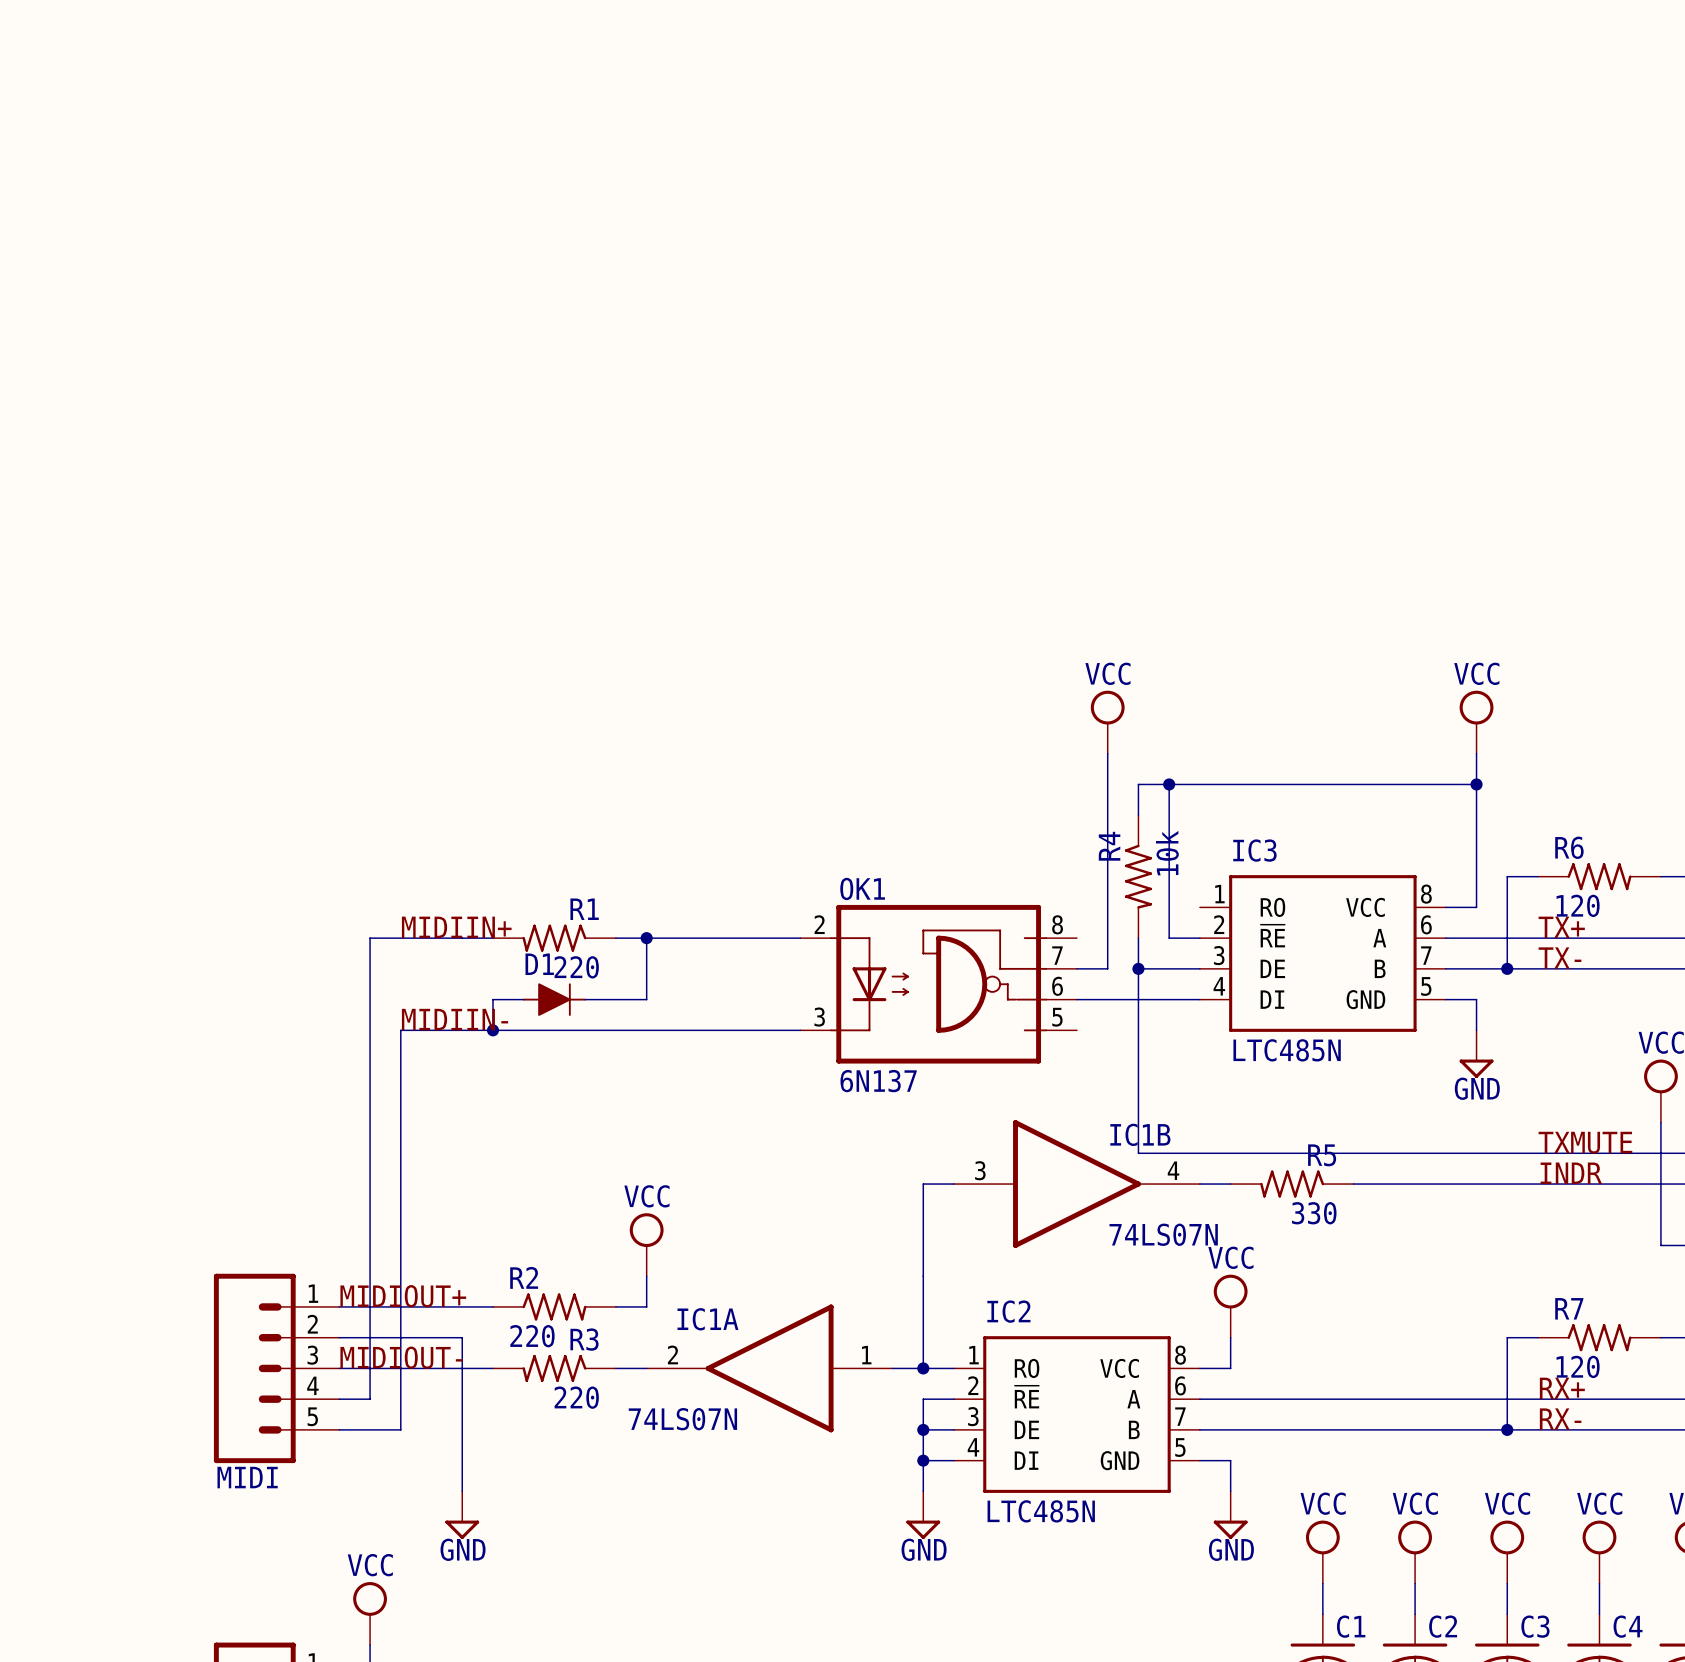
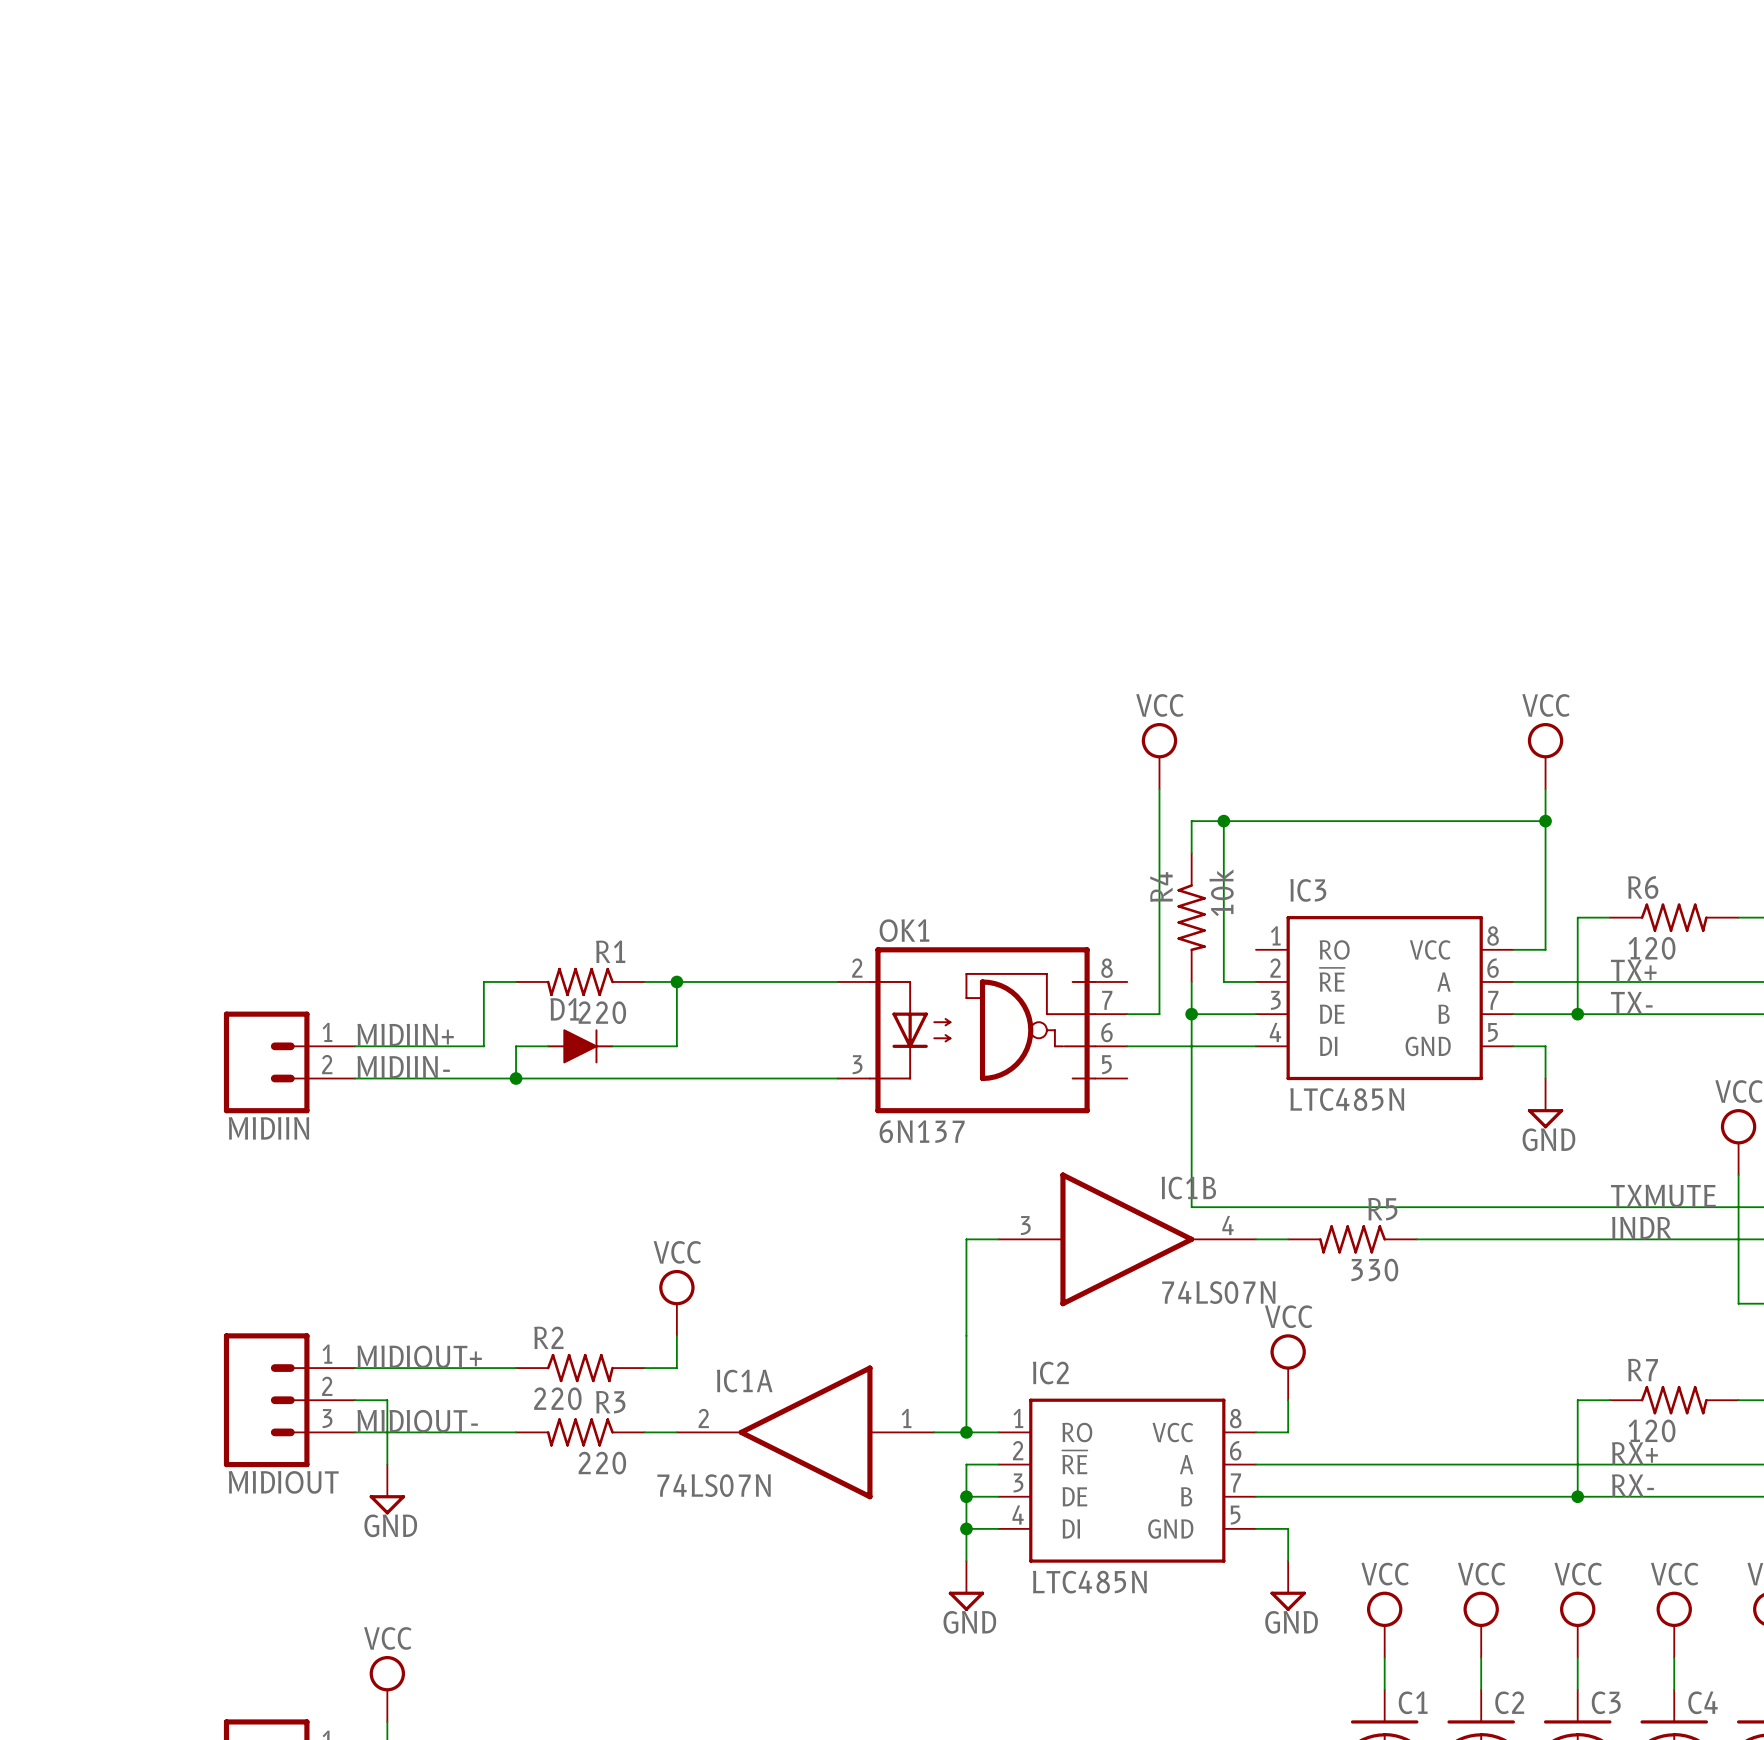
label position: MIDIIN+ (456, 927) -> MIDIIN+ (405, 1035)
wire: (462, 938) (370, 938) (370, 1337) (462, 1337) (462, 1491) -> (483, 981) (483, 1046) (355, 1046)
MIDIIN: none -> (289, 1062)
label position: MIDIIN- (455, 1019) -> MIDIIN- (403, 1067)
wire: (400, 1030) (400, 1429) (339, 1429) -> (419, 1078) (355, 1078)
MIDIOUT: none -> (289, 1400)
MIDI: (276, 1368) -> none
wire: (339, 1399) (370, 1399) -> none
power symbol position: GND (462, 1515) -> GND (387, 1489)

